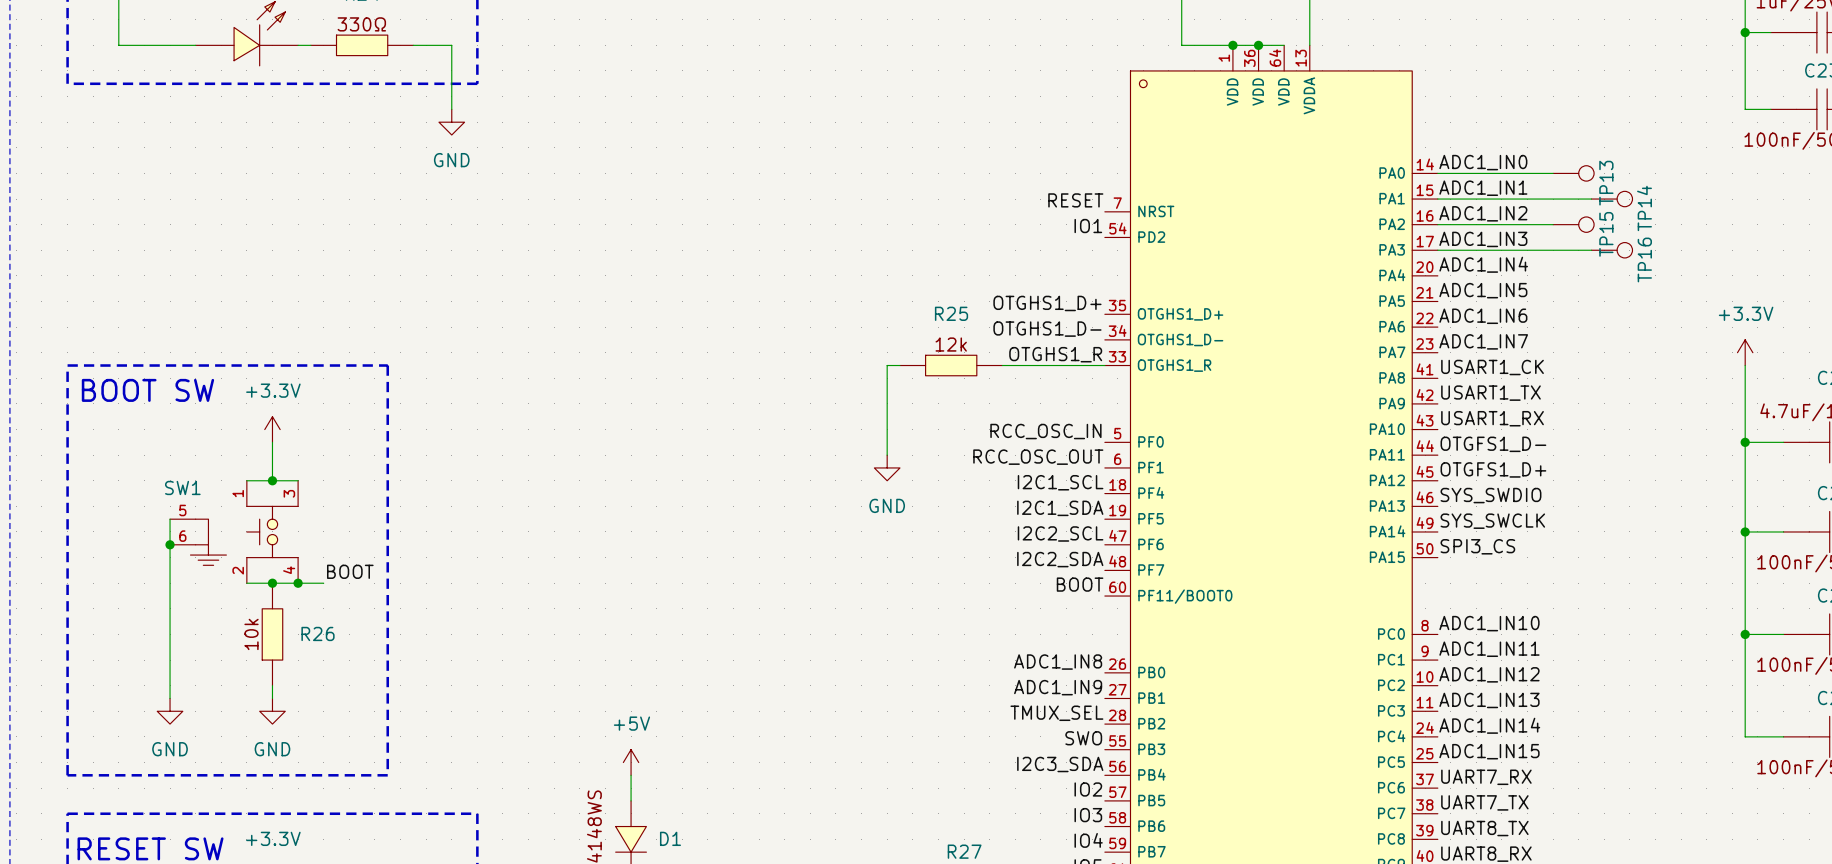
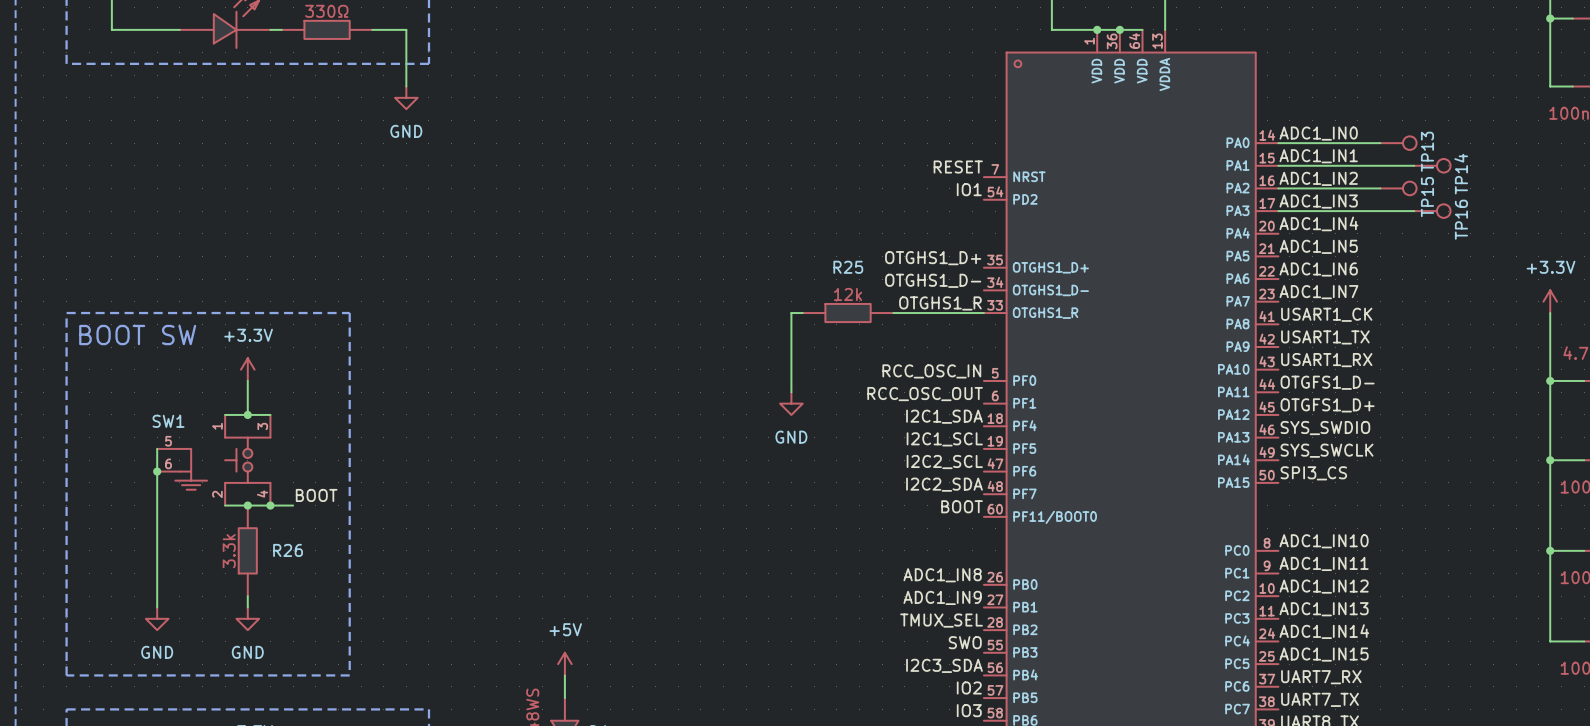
label: I2C1_SCL (1060, 482) -> I2C1_SDA (944, 416)
label: I2C1_SDA (1060, 508) -> I2C1_SCL (944, 439)
R26 text: 10k (251, 634) -> 3.3k (229, 551)

